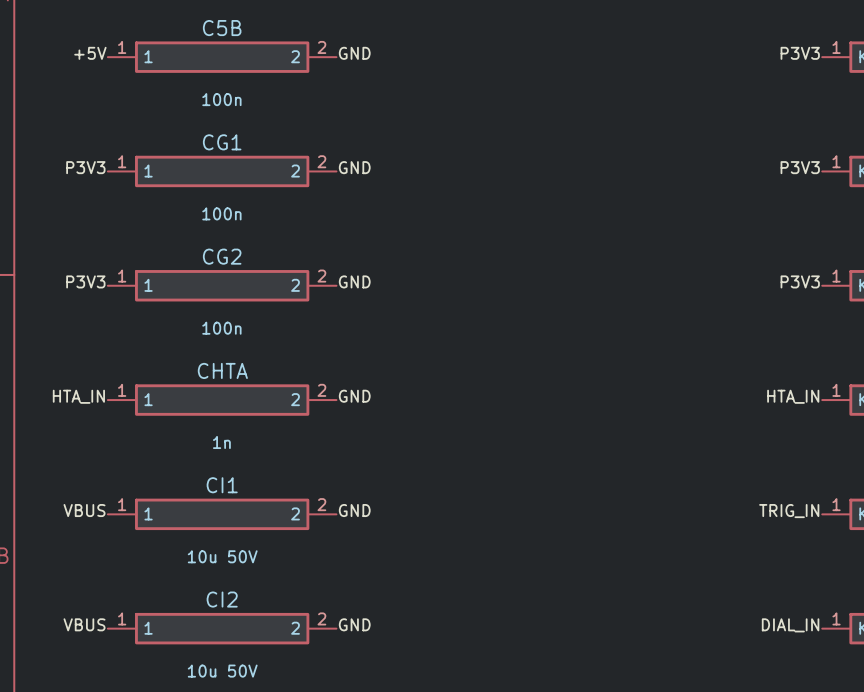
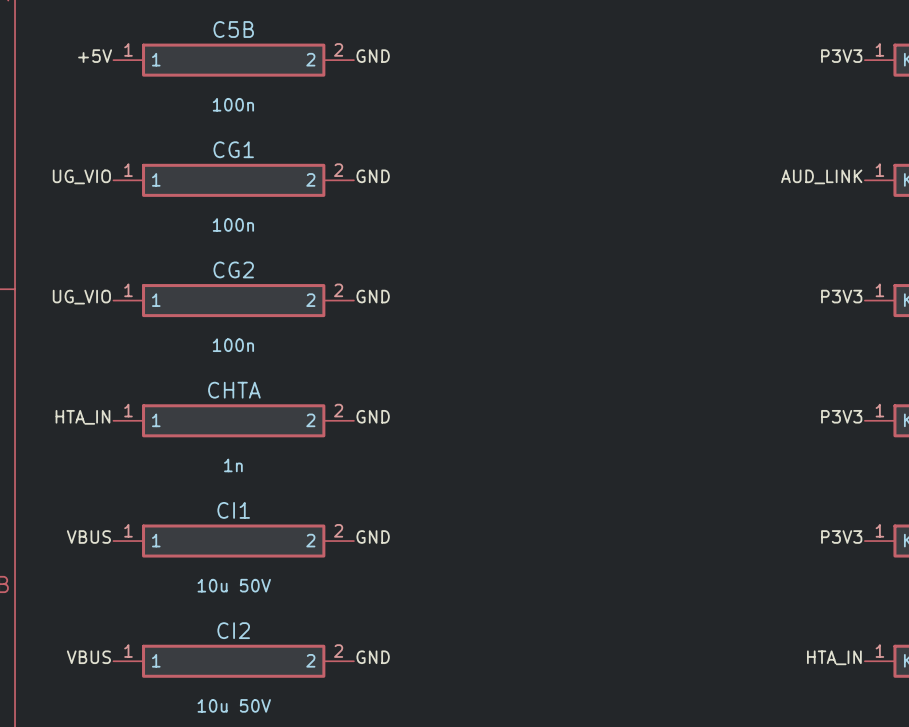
label: P3V3 (85, 167) -> UG_VIO (81, 176)
label: P3V3 (800, 167) -> AUD_LINK (821, 176)
label: P3V3 (85, 281) -> UG_VIO (81, 297)
label: HTA_IN (793, 396) -> P3V3 (841, 416)
label: TRIG_IN (789, 511) -> P3V3 (841, 537)
label: DIAL_IN (790, 625) -> HTA_IN (834, 657)

